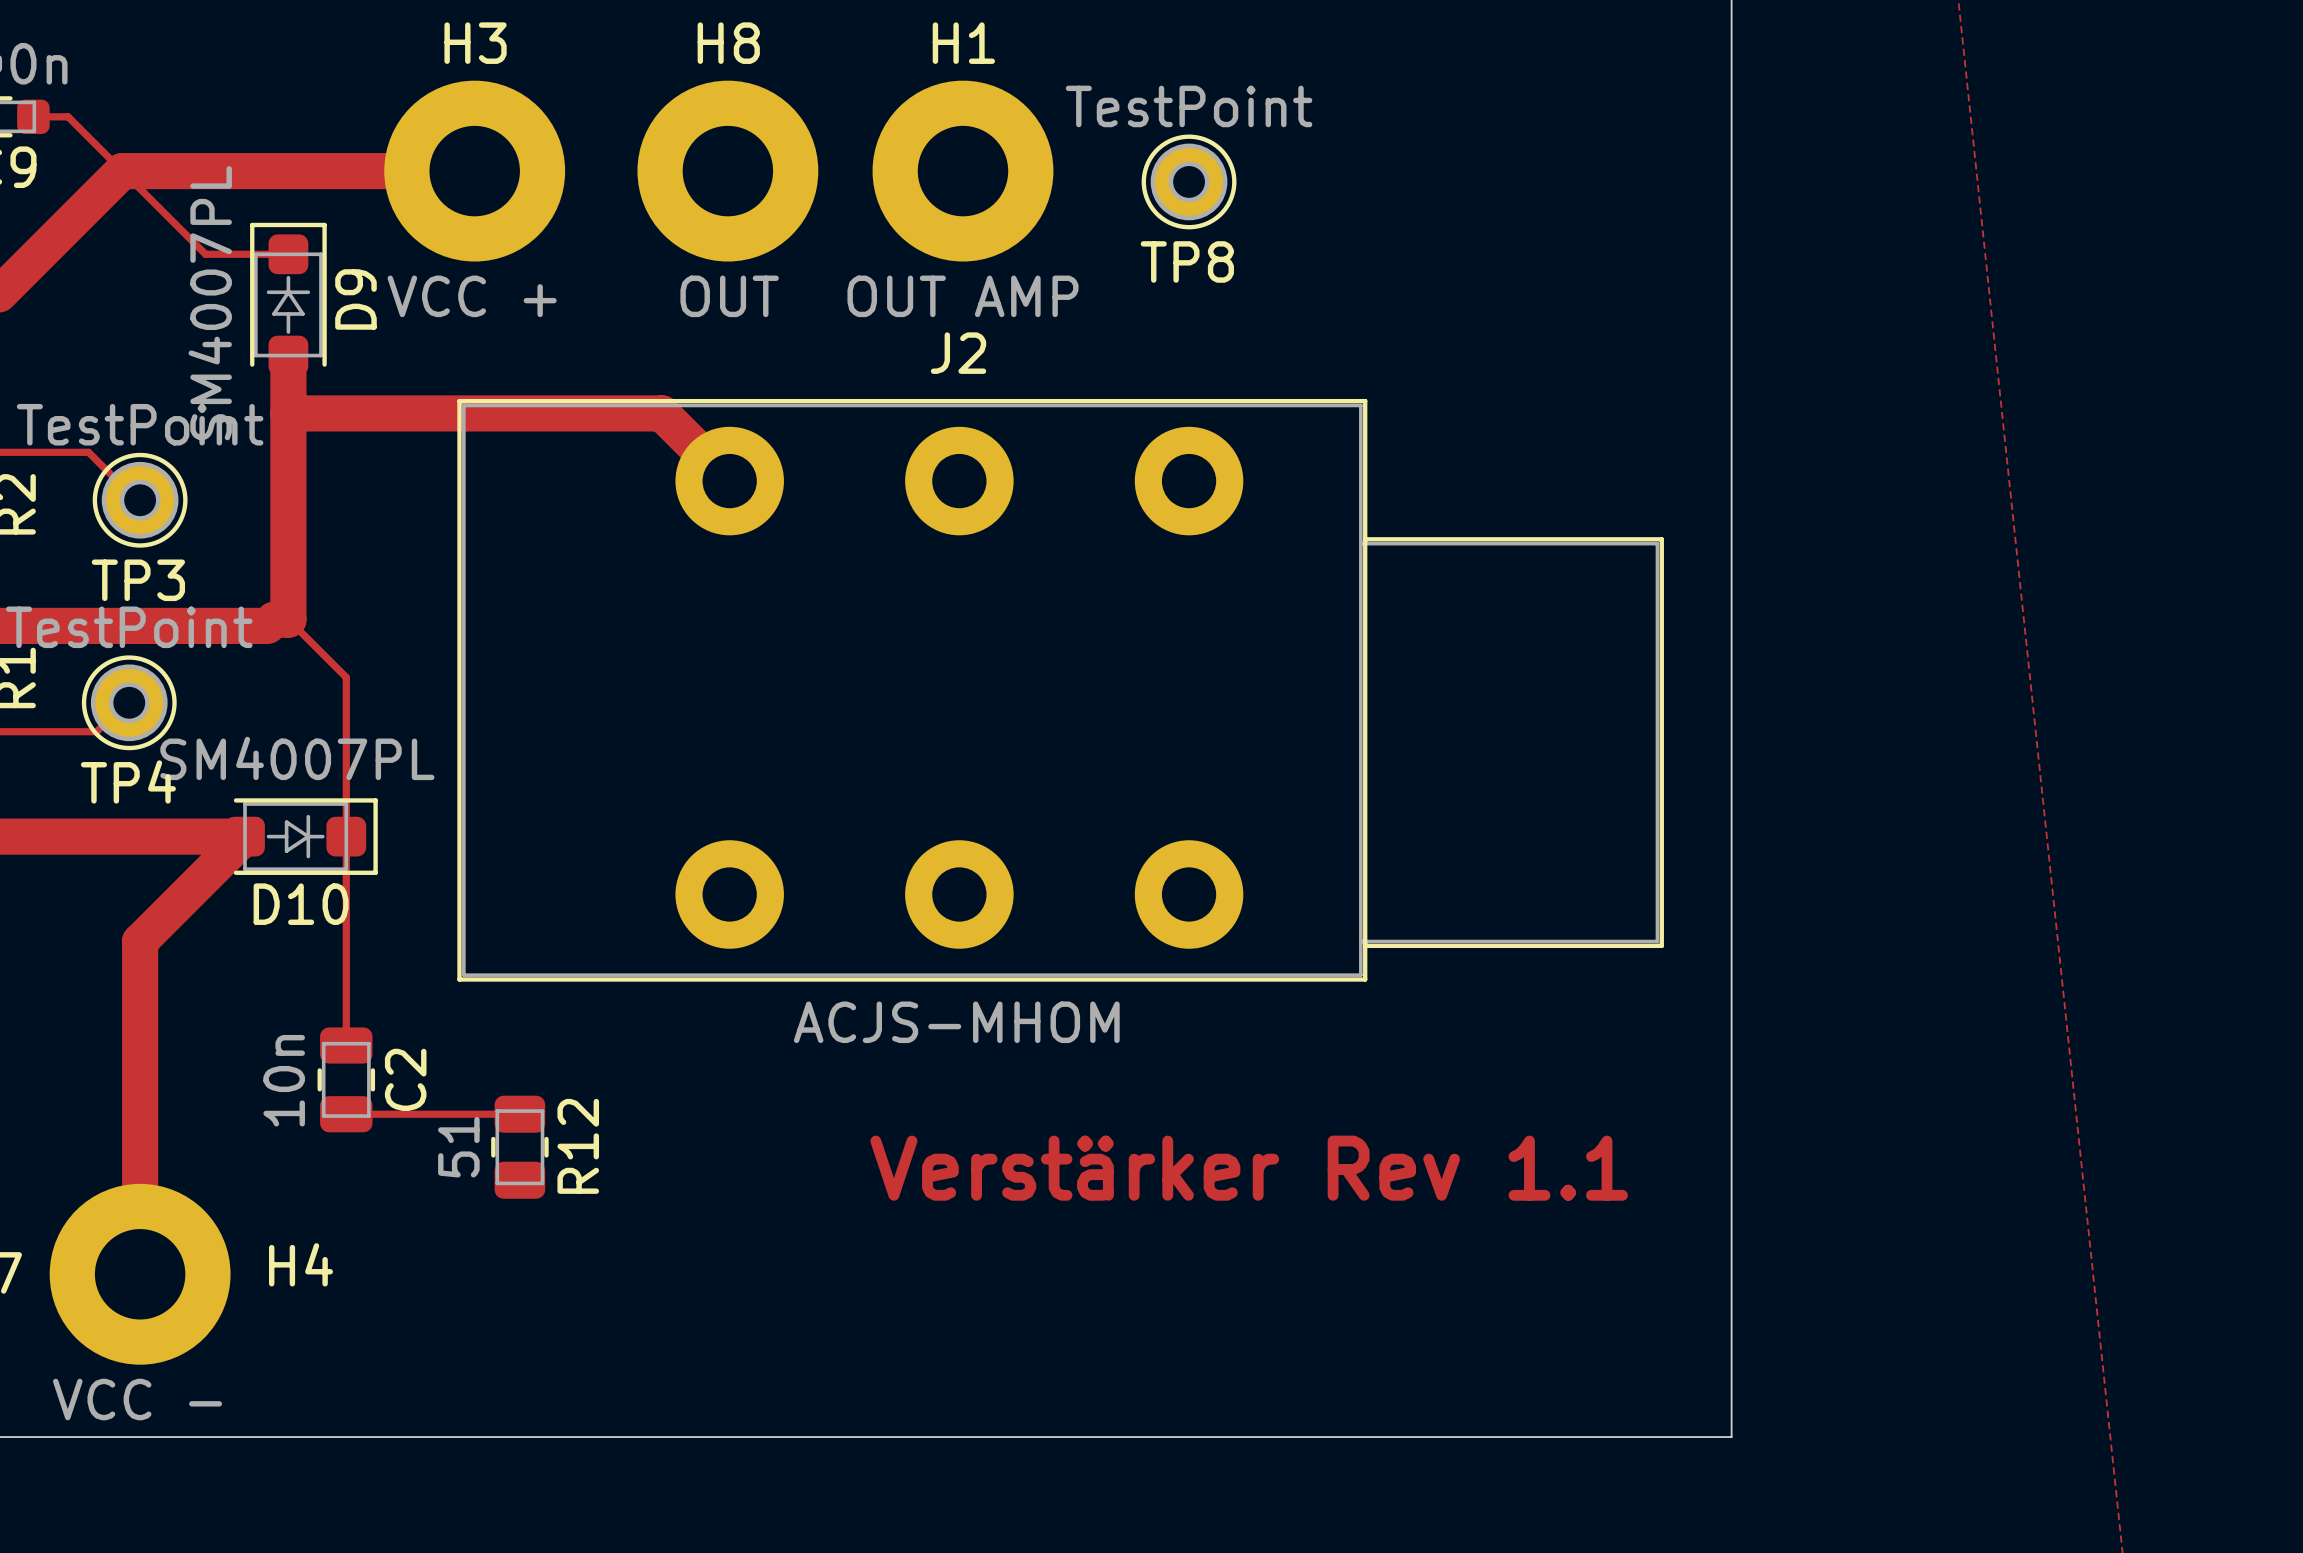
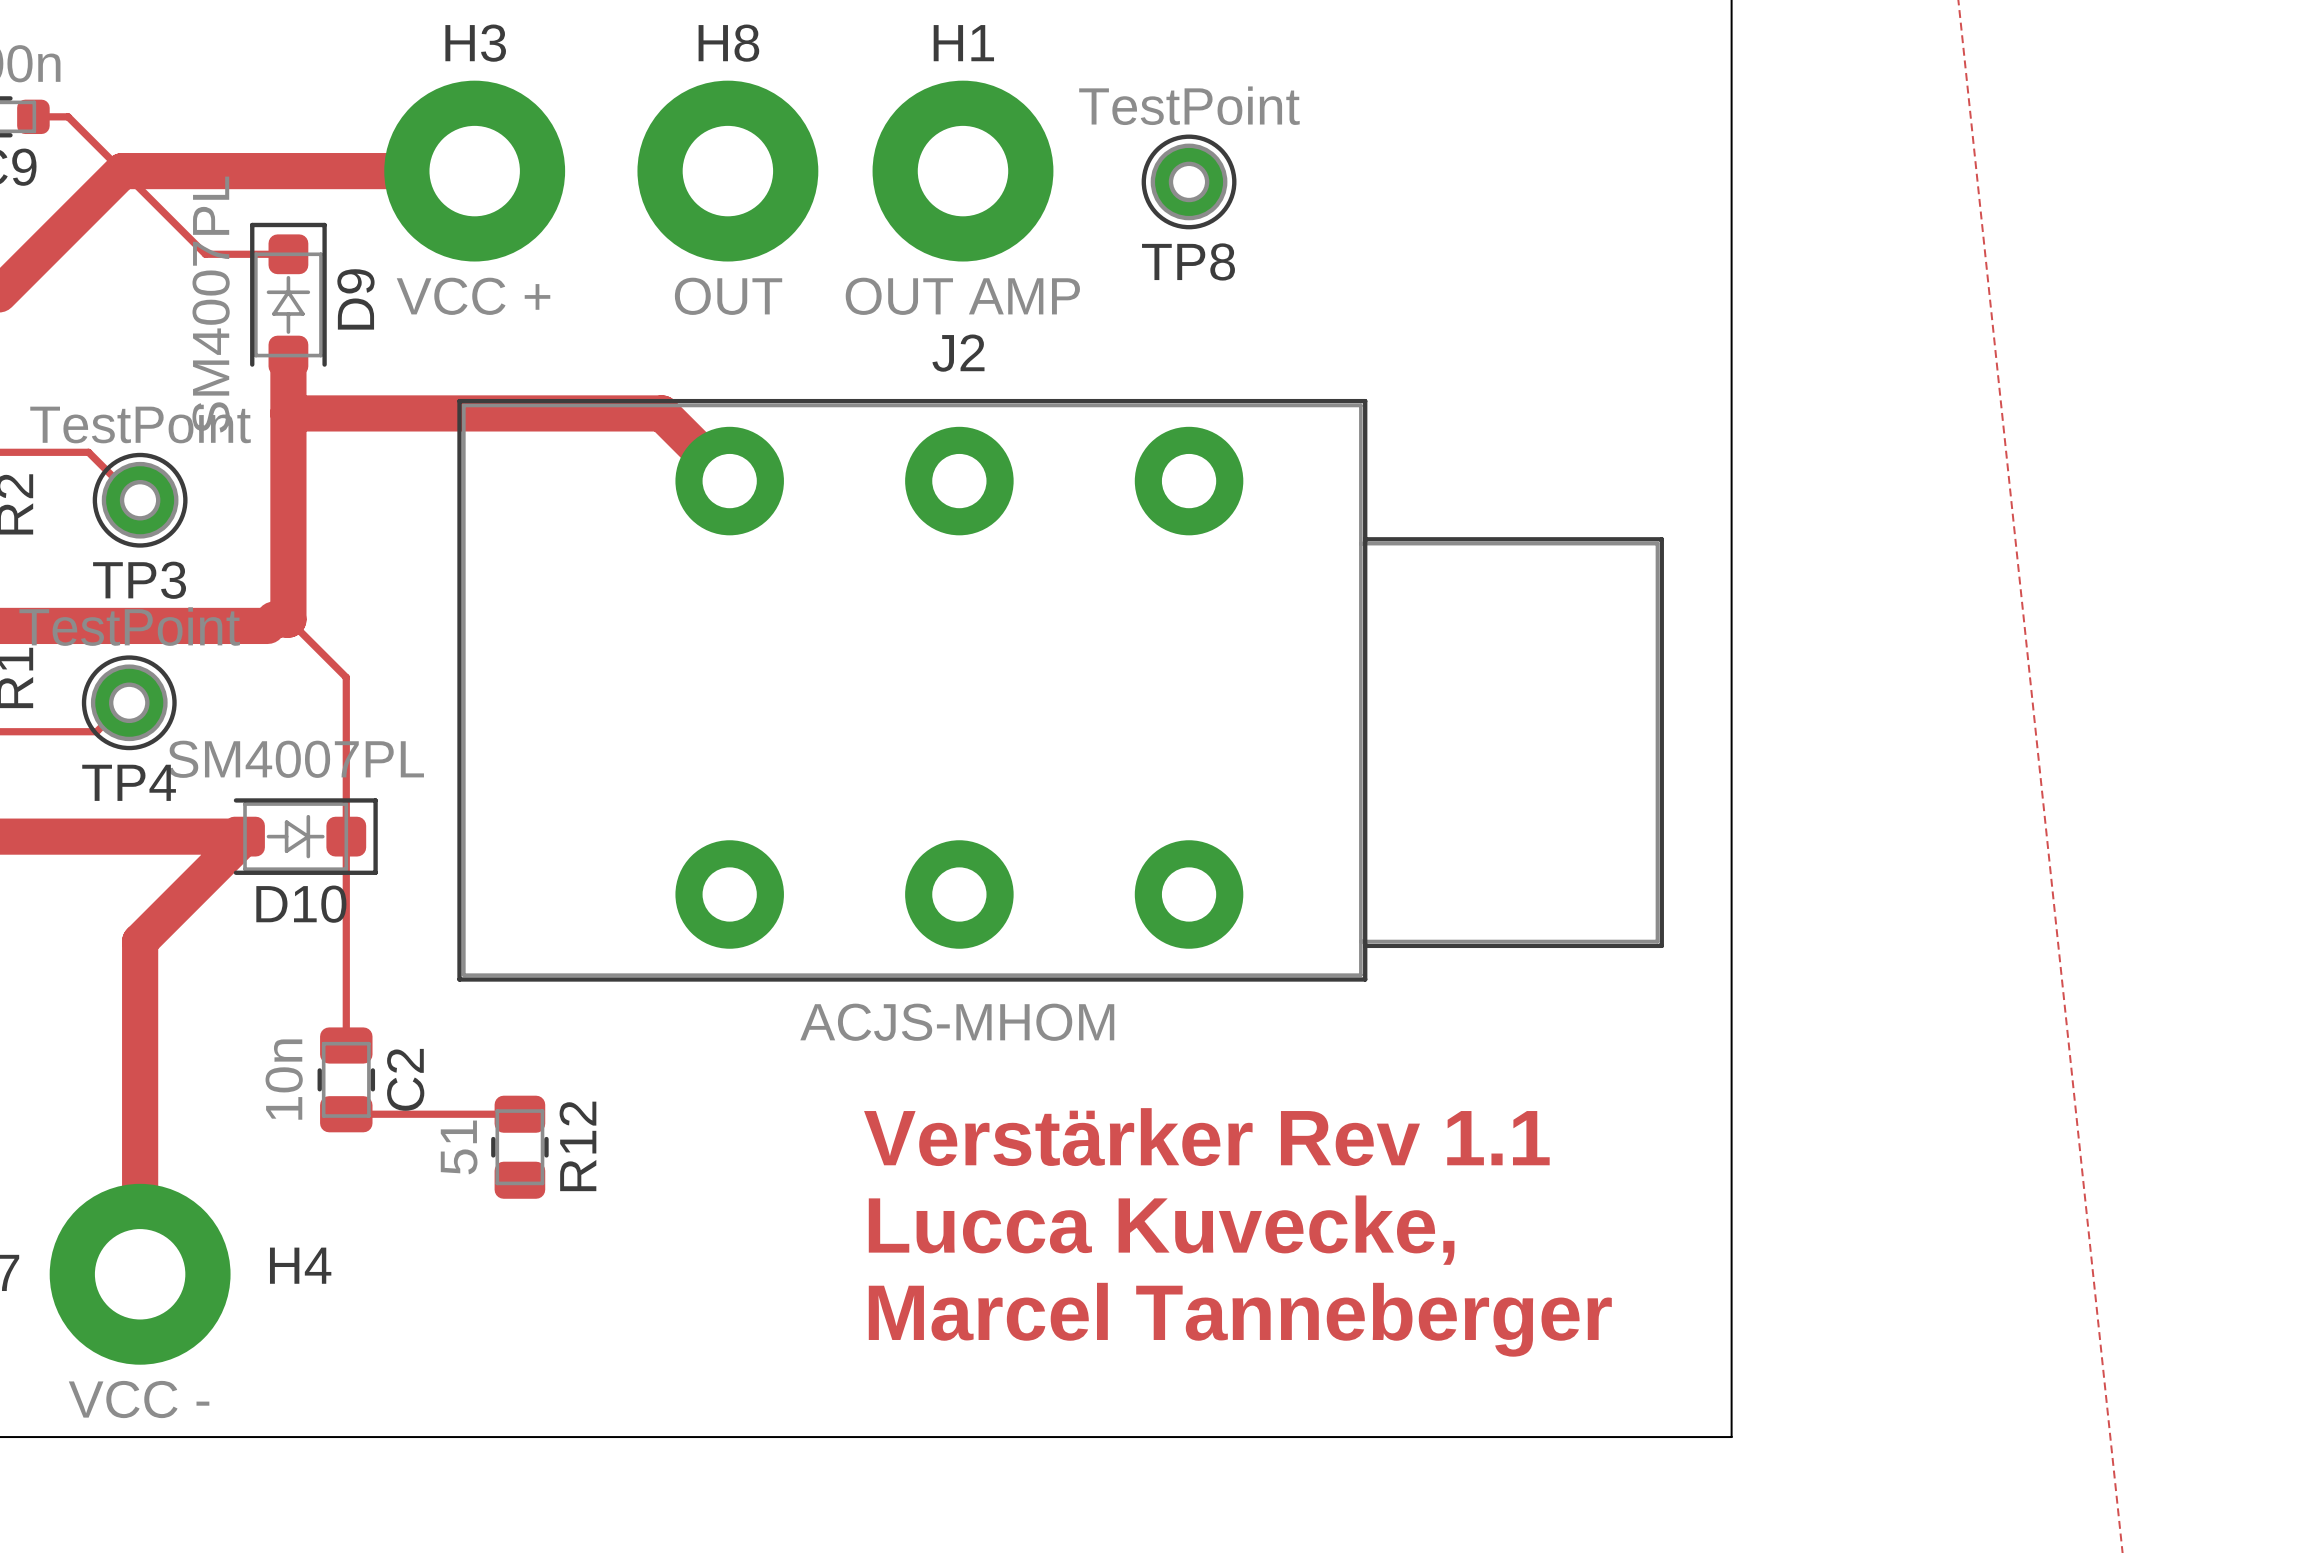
text position: Verstärker Rev 1.1 (1249, 1168) -> Verstärker Rev 1.1 (1206, 1137)
text: none -> Lucca Kuvecke, (1161, 1230)
text: none -> Marcel Tanneberger (1240, 1319)

